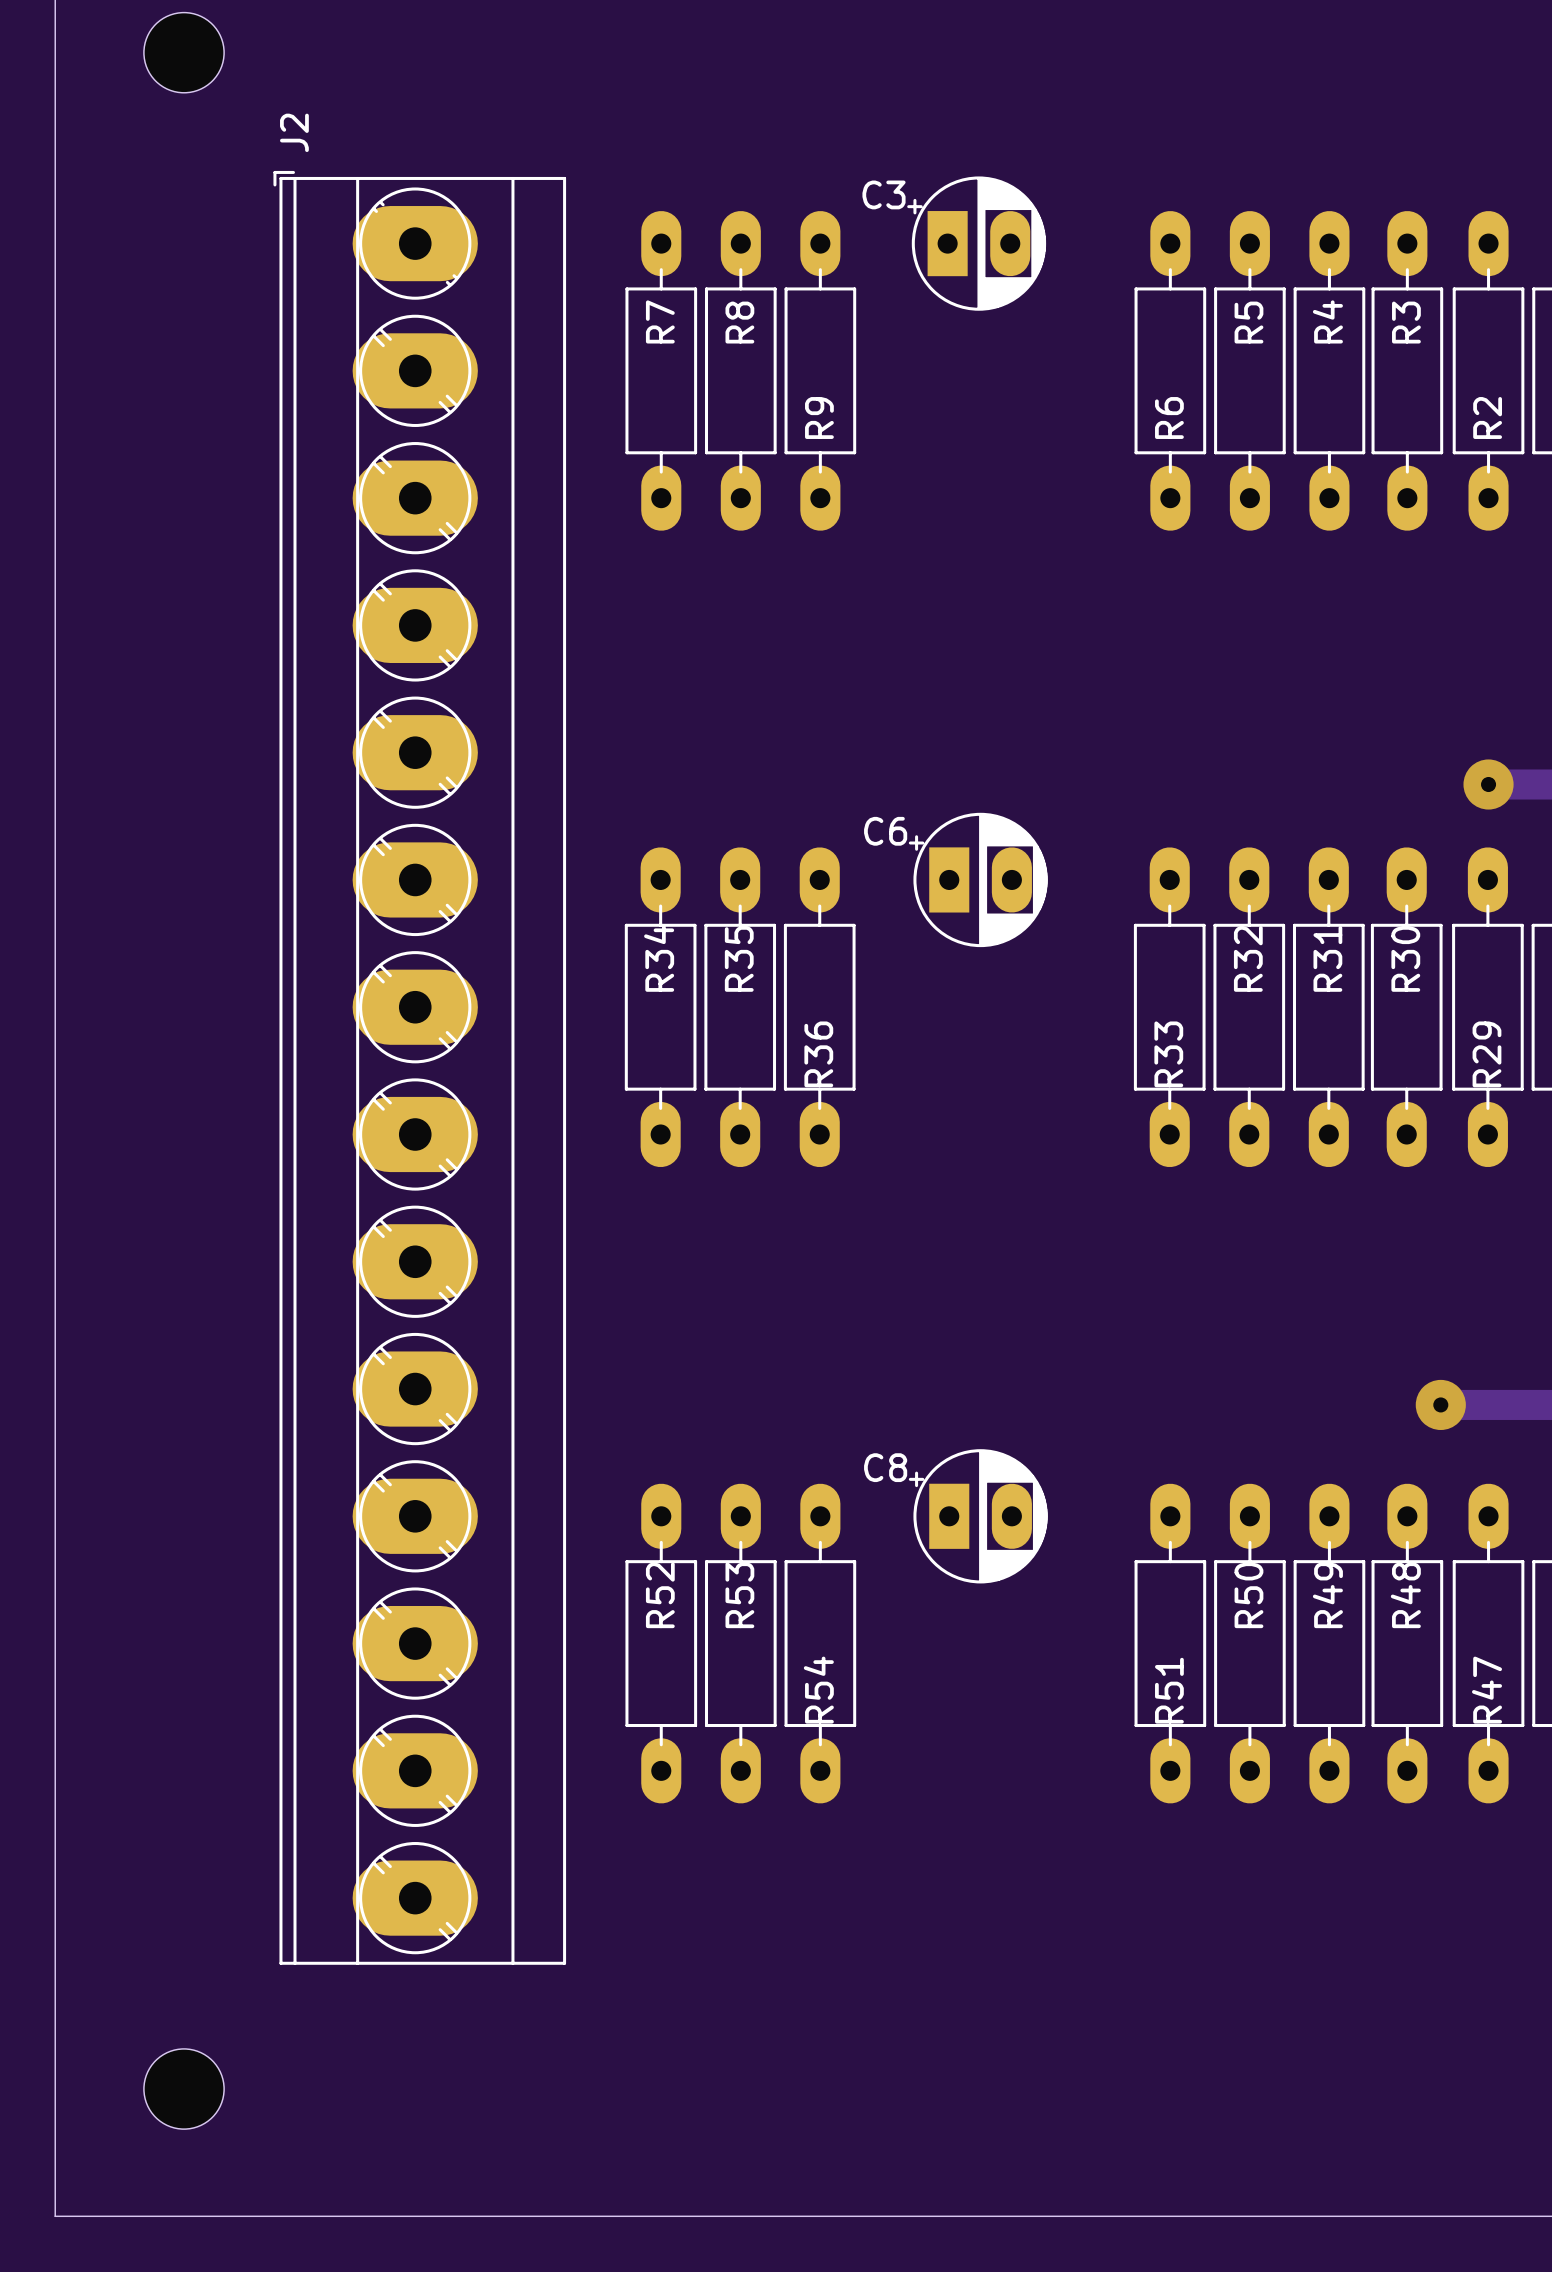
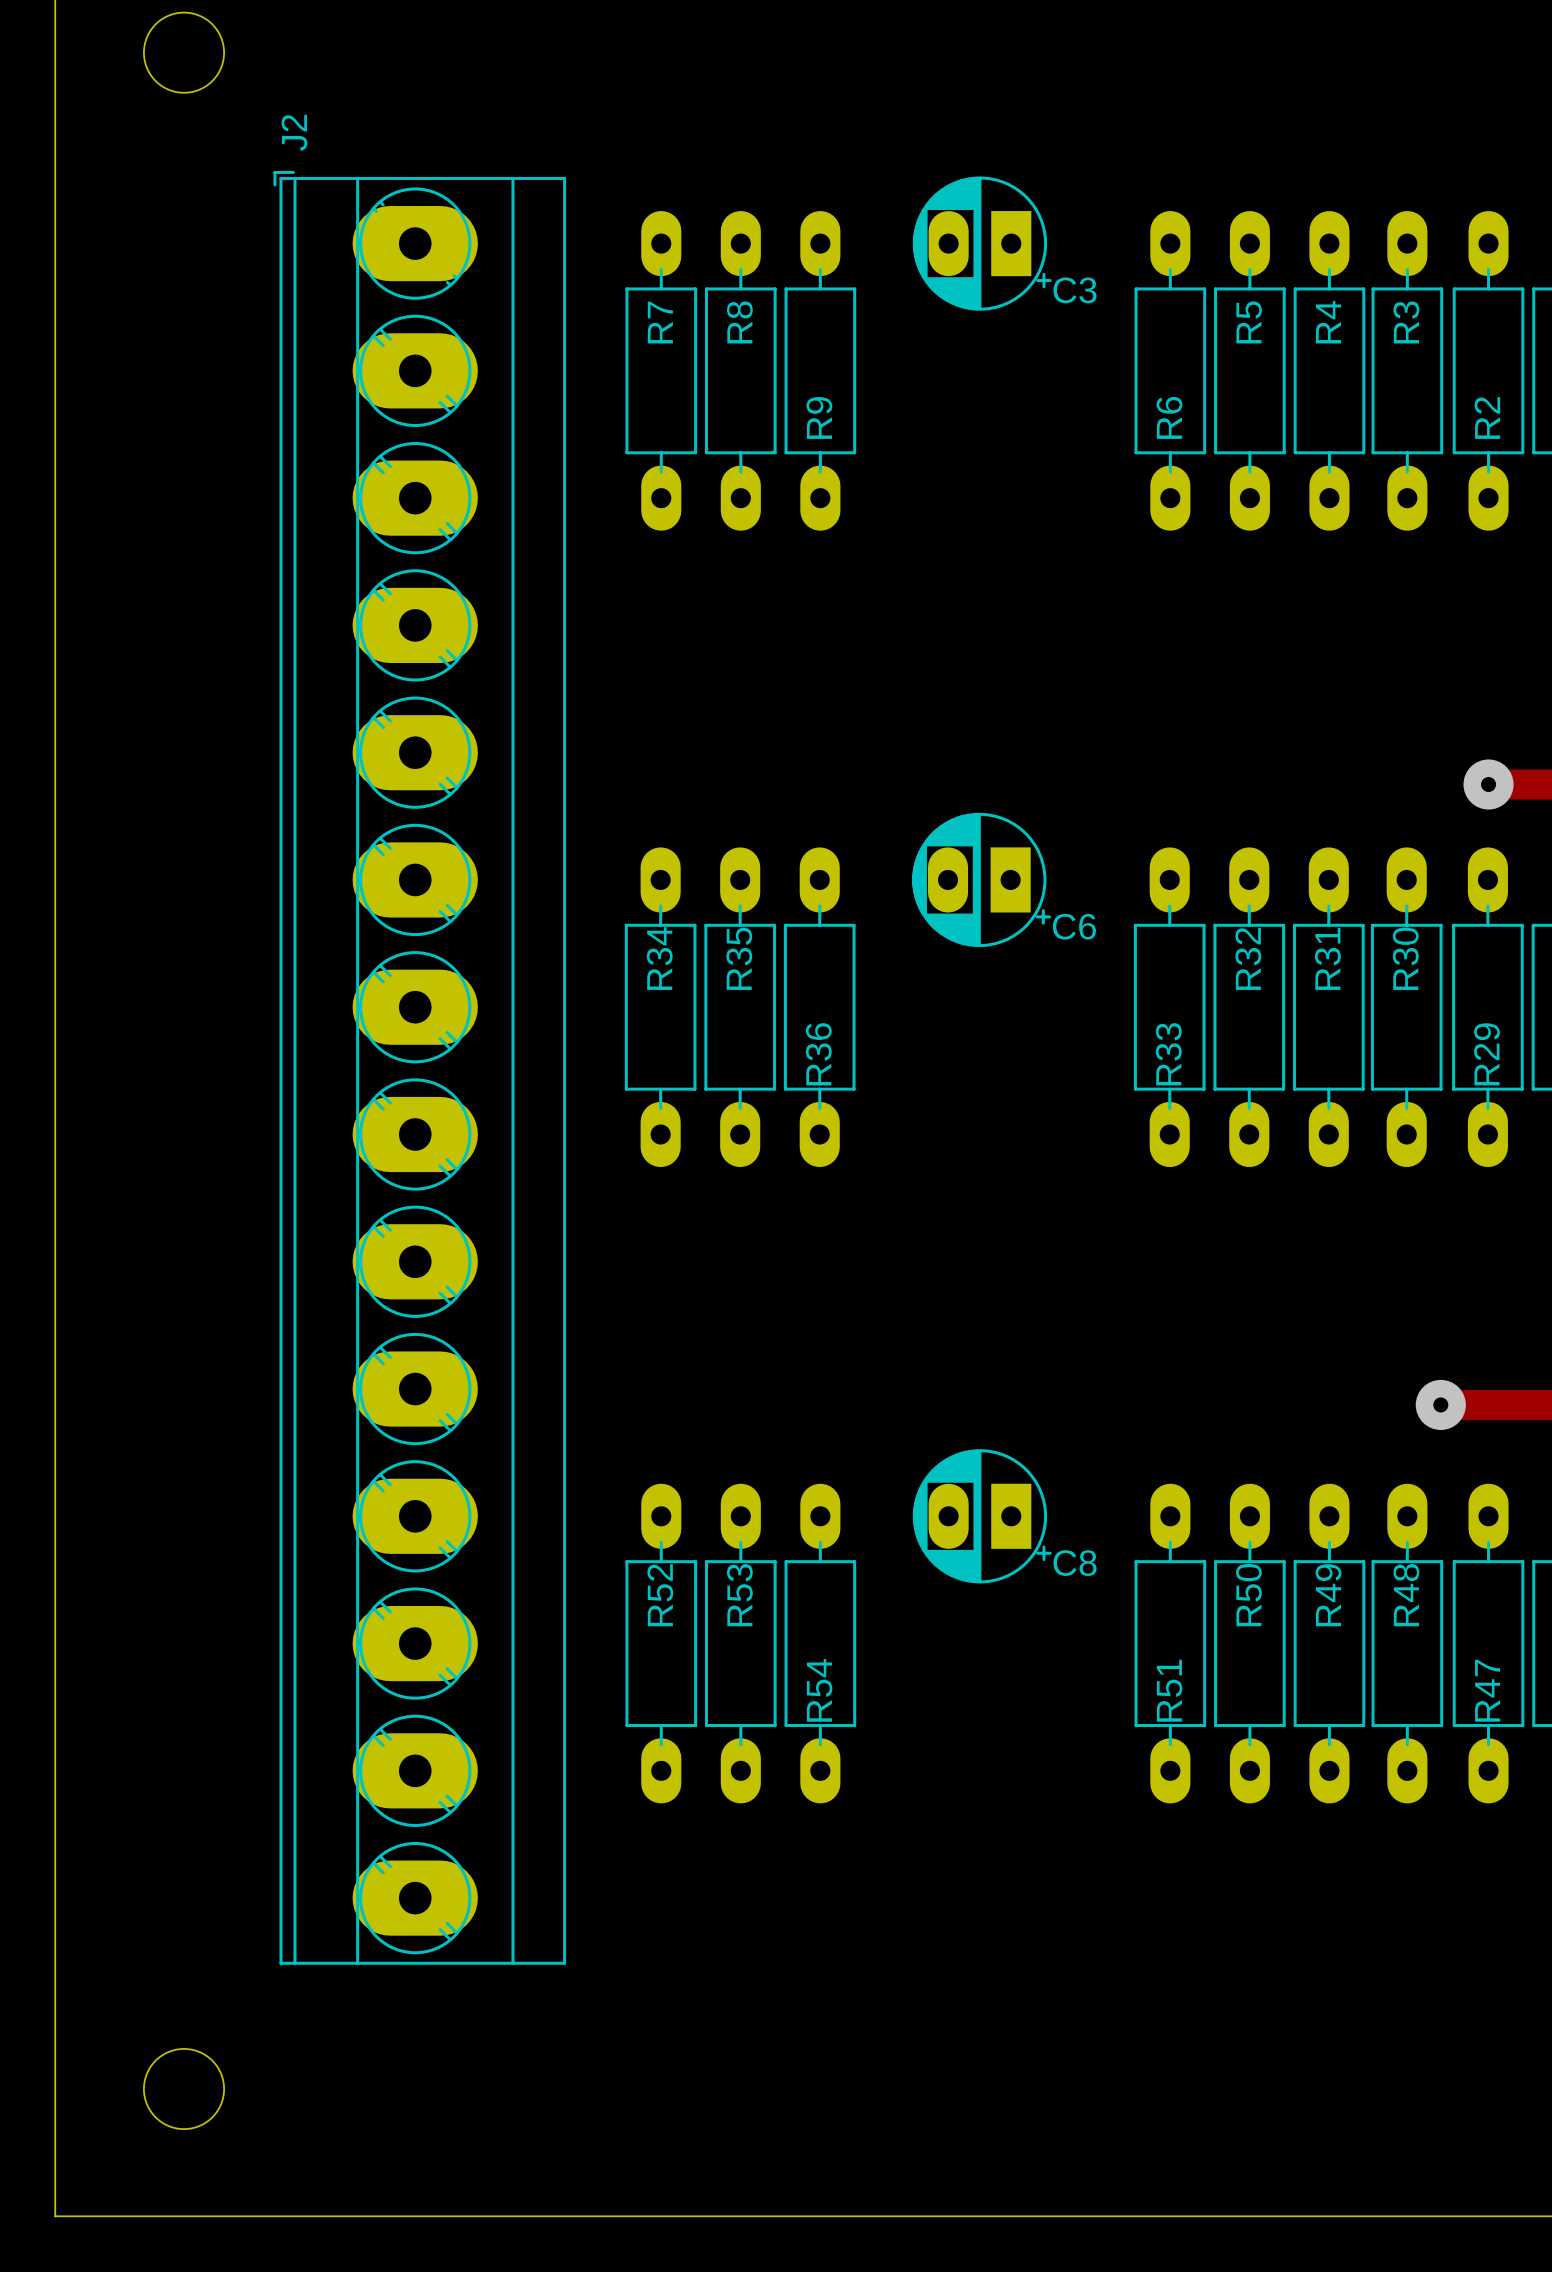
C3 rotation: 0° (976, 243) -> 180° (982, 243)
C6 rotation: 0° (978, 879) -> 180° (981, 879)
C8 rotation: 0° (978, 1516) -> 180° (982, 1516)

